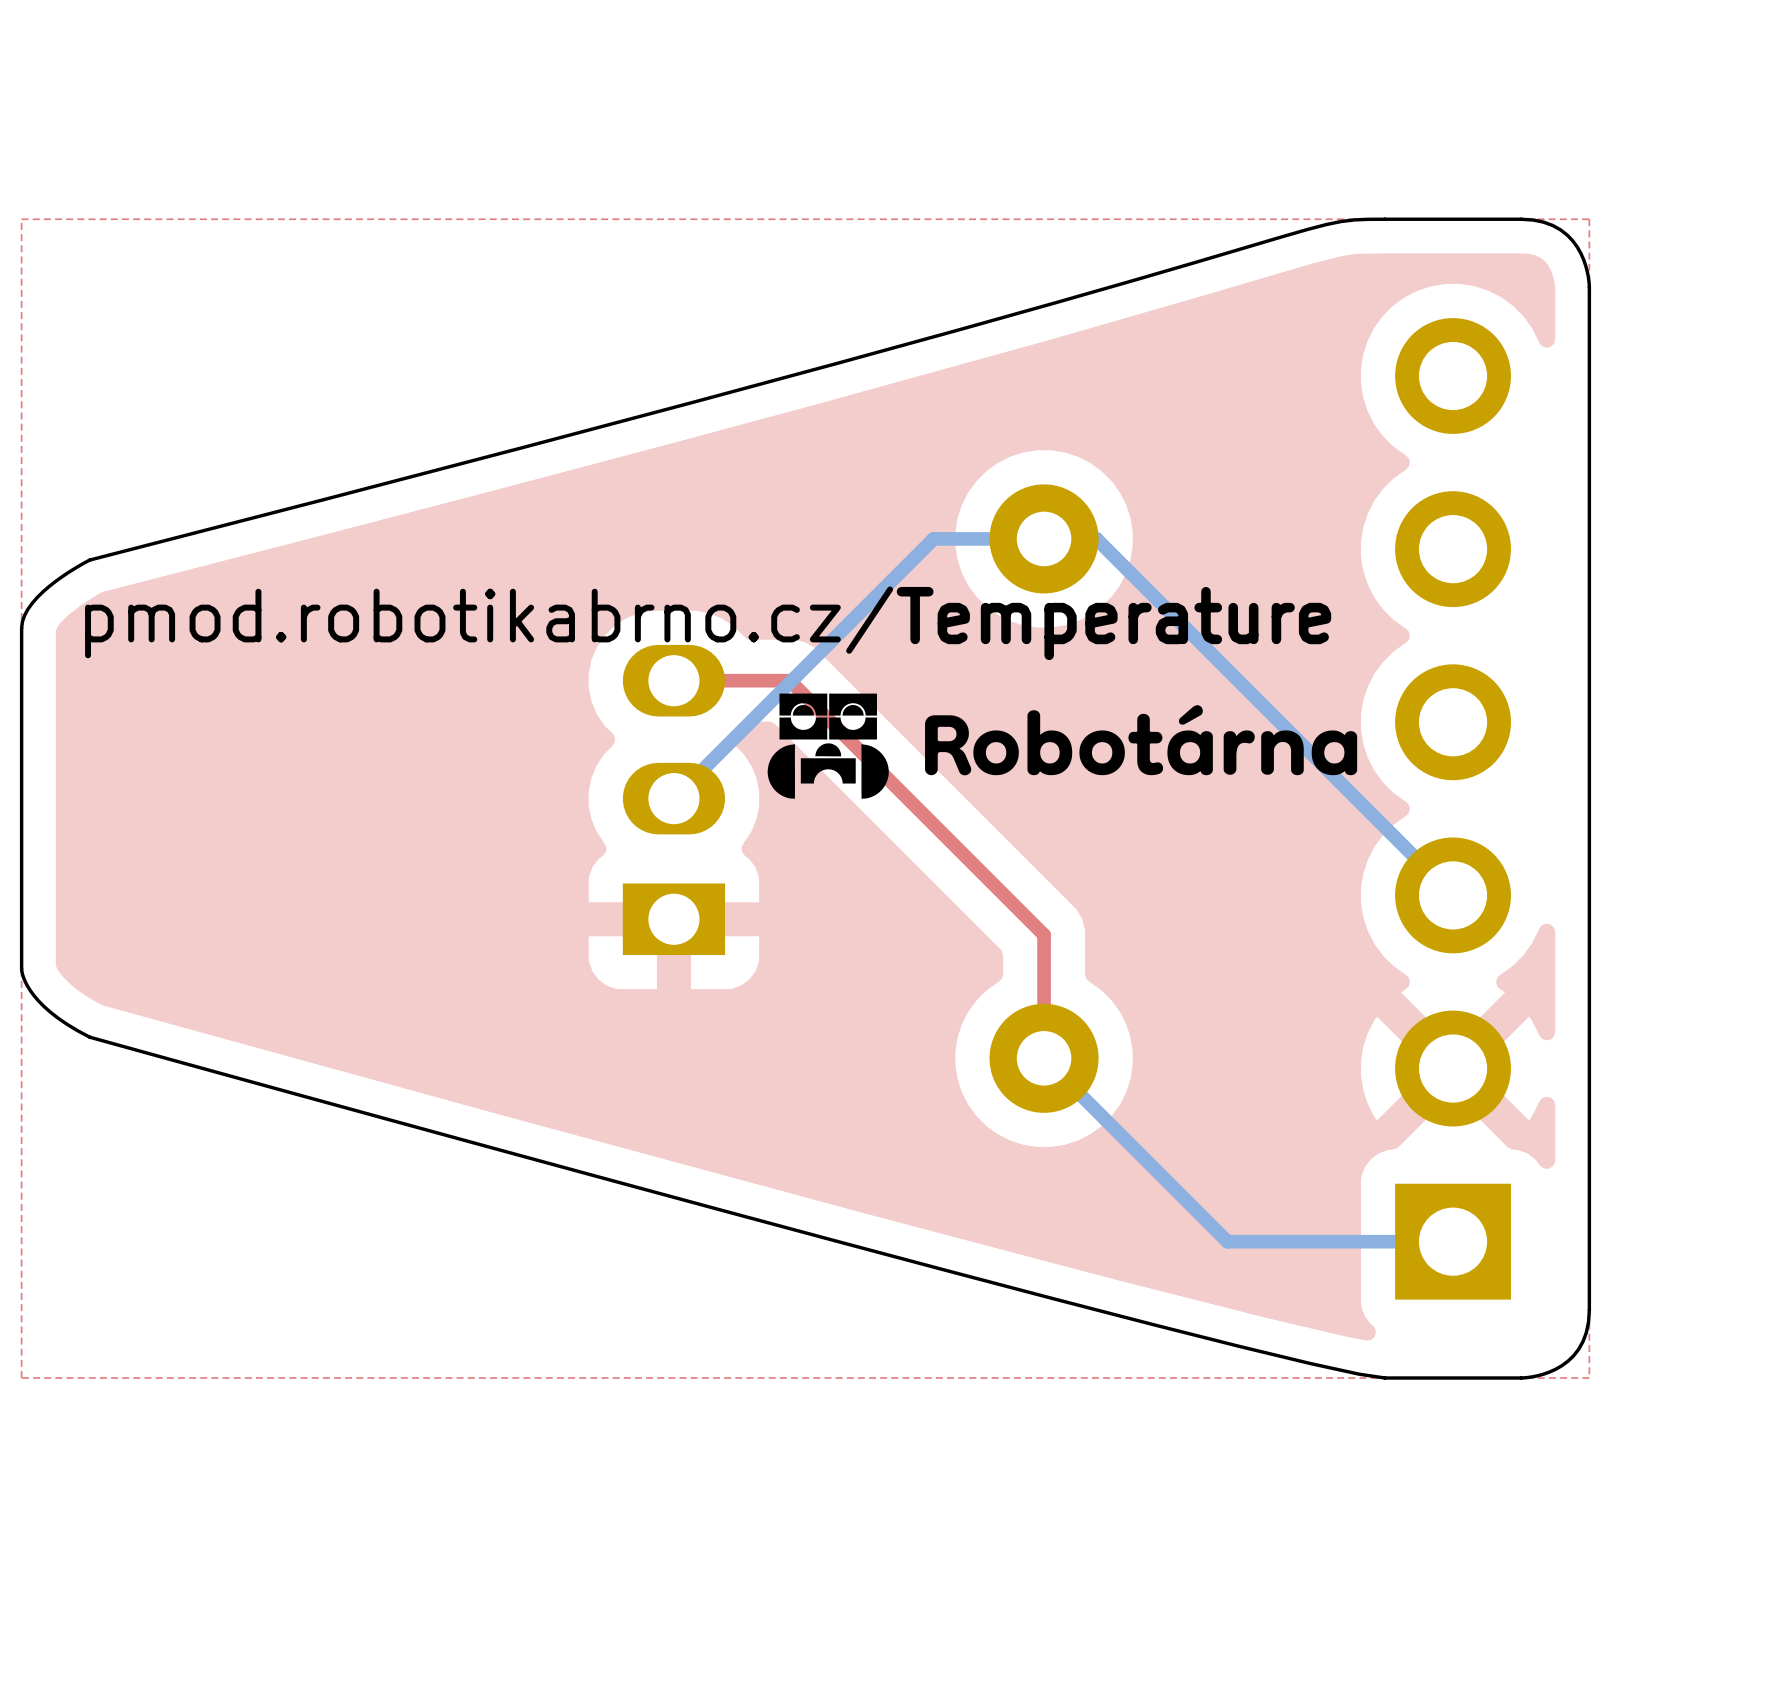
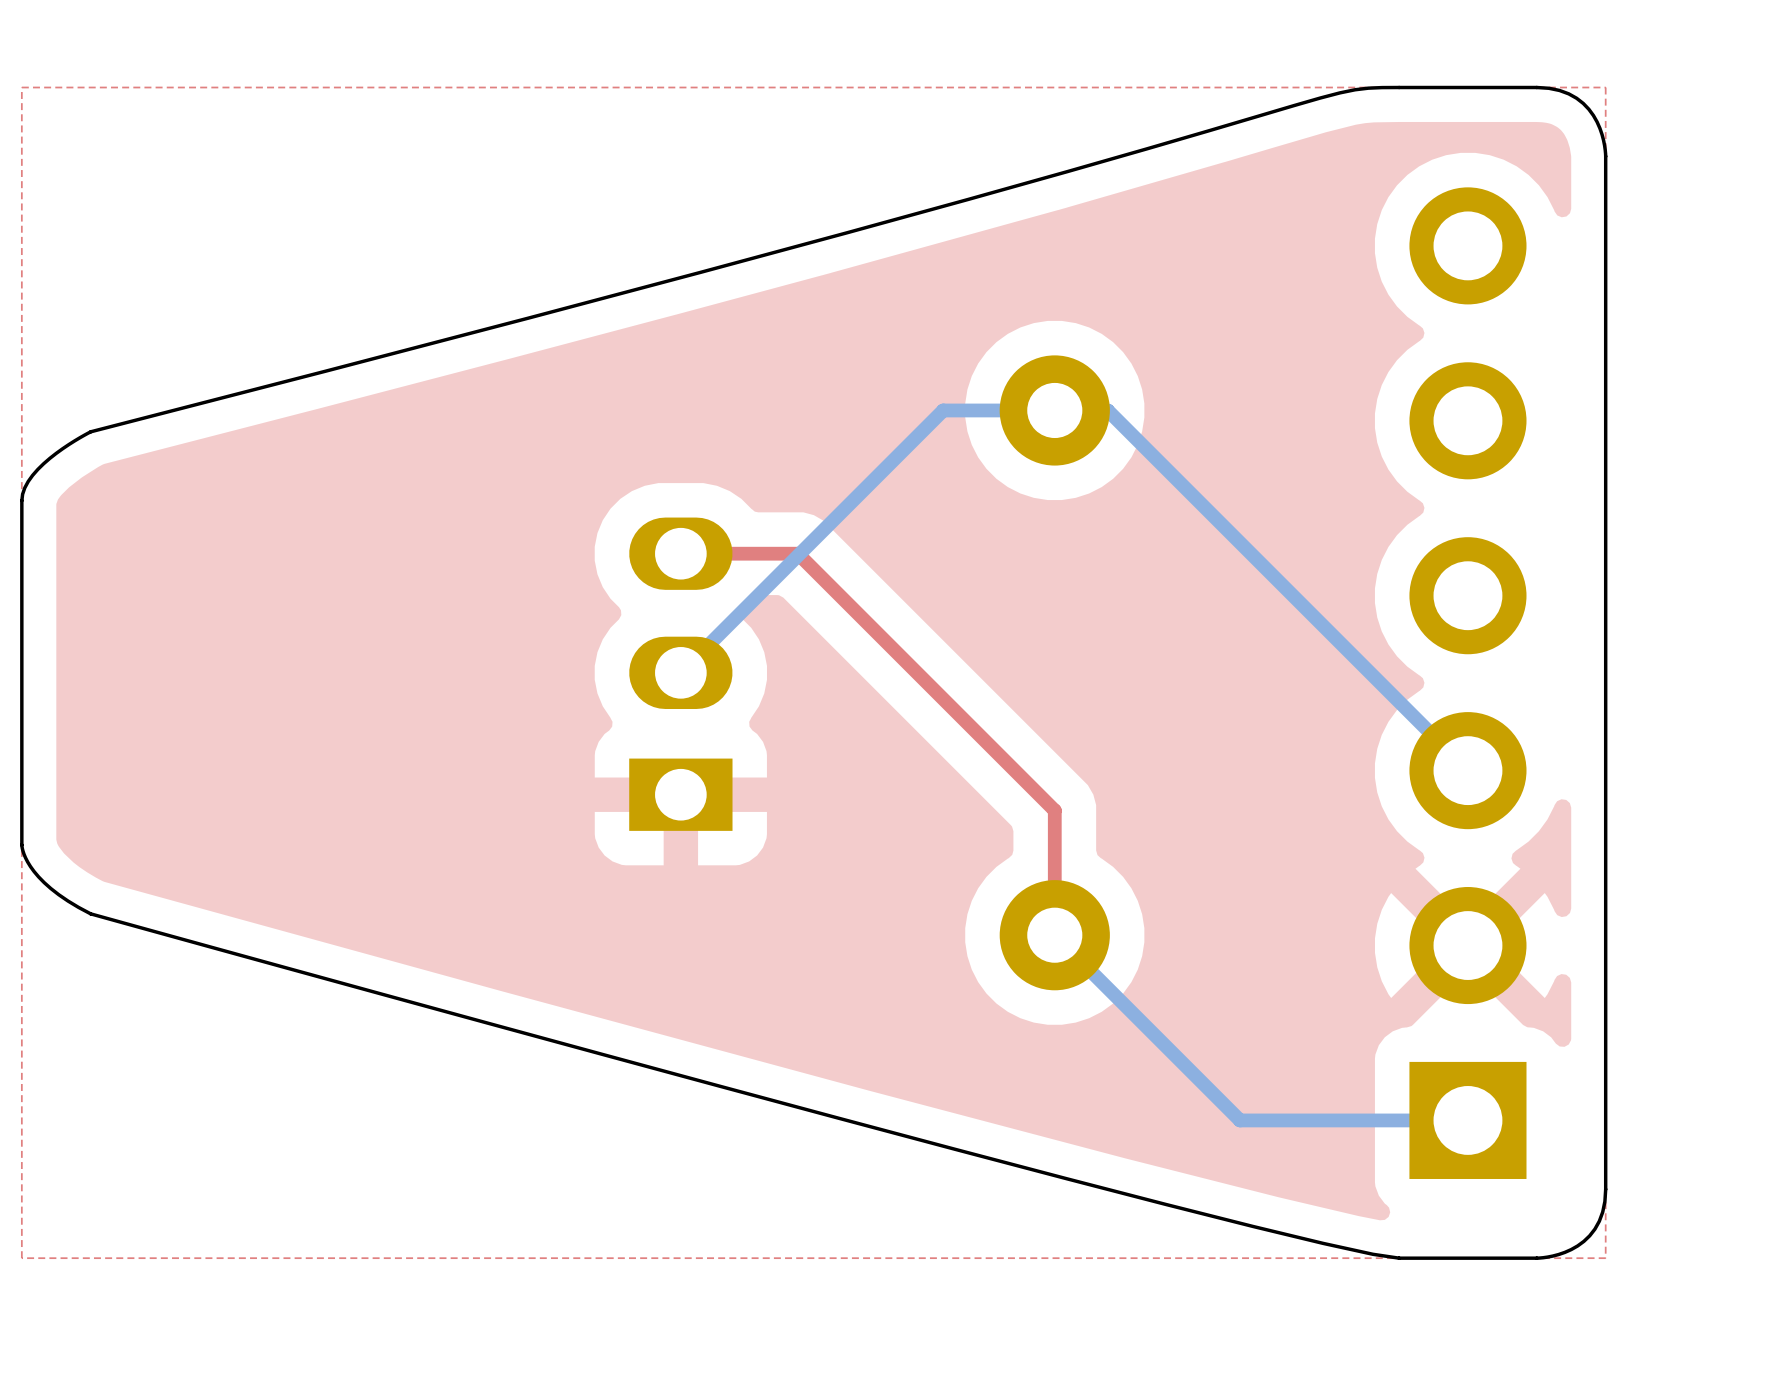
text: pmod.robotikabrno.cz/ (489, 622) -> none
text: Temperature (1113, 623) -> none
drawing: [767, 693, 1358, 799] -> none

